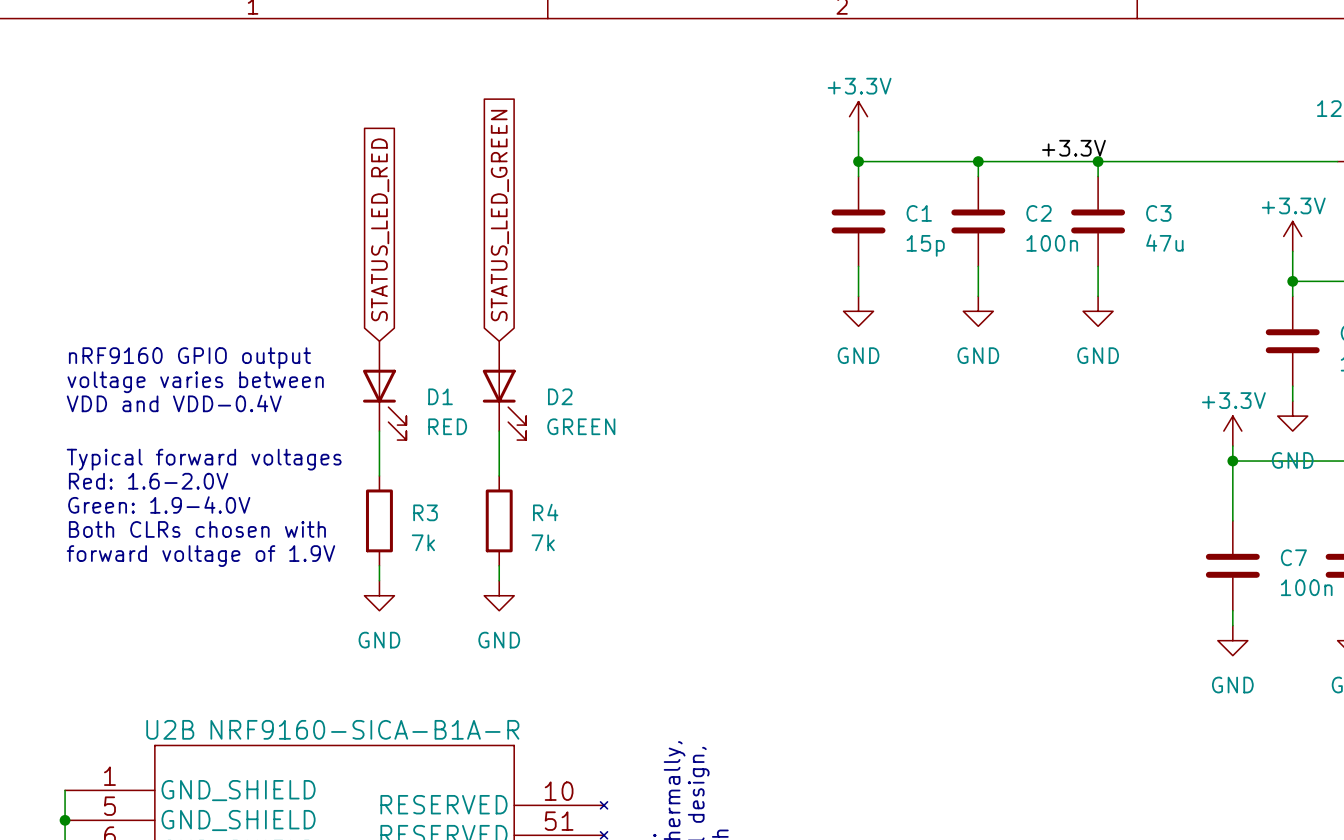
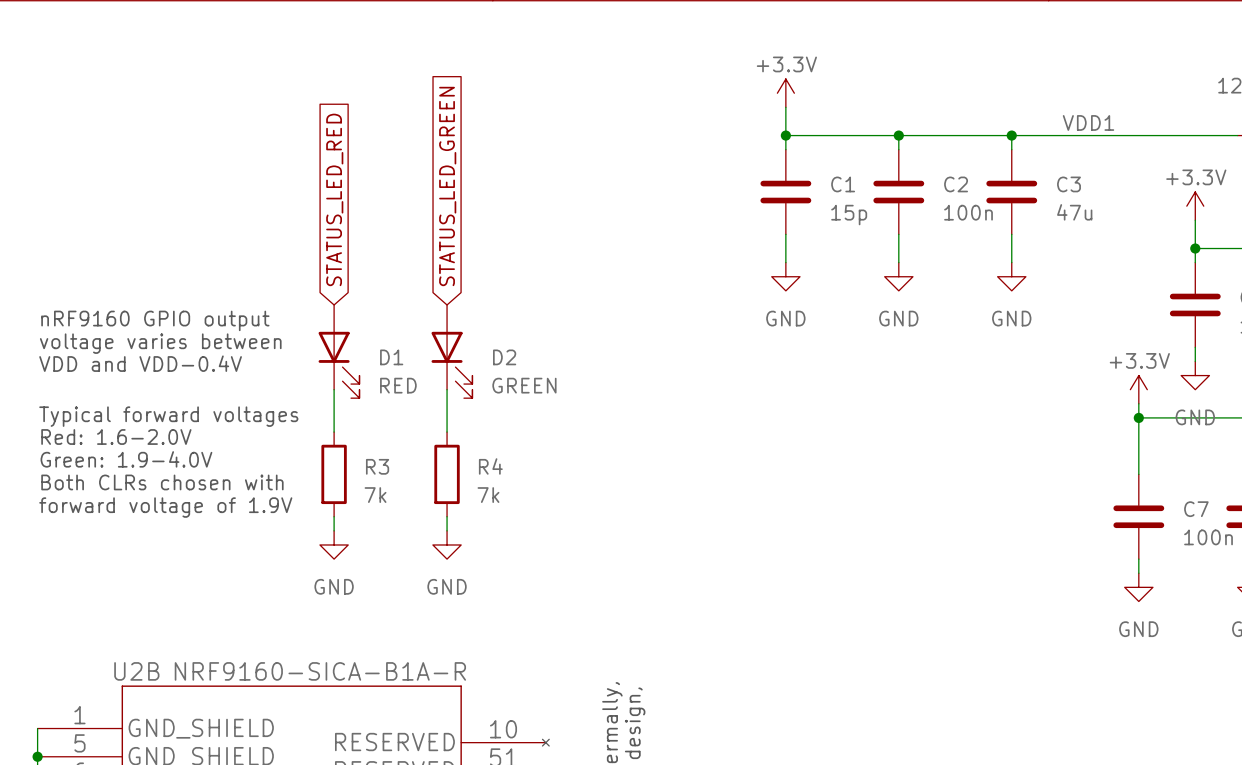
label: +3.3V (1073, 148) -> none
label: none -> VDD1 (1088, 122)

